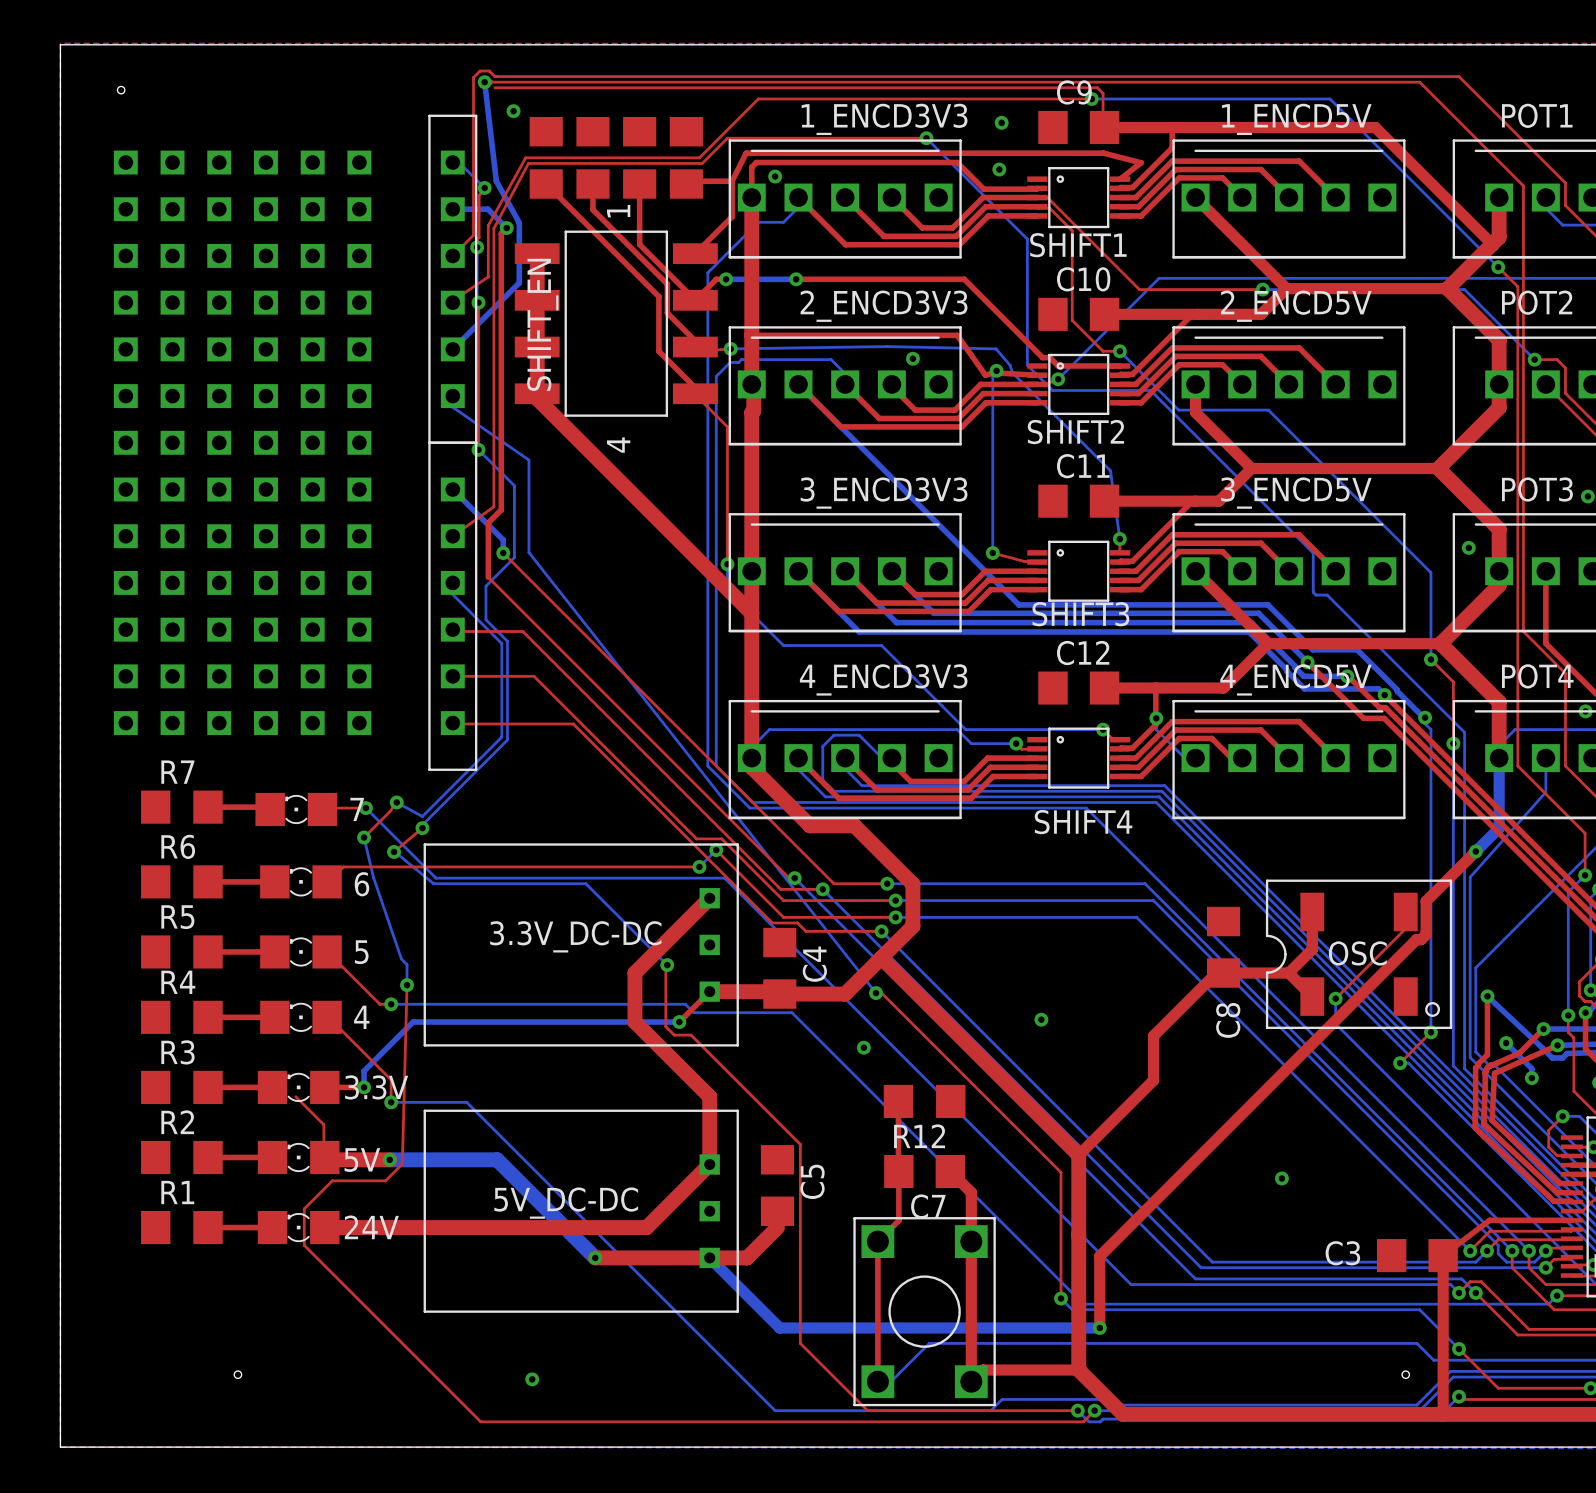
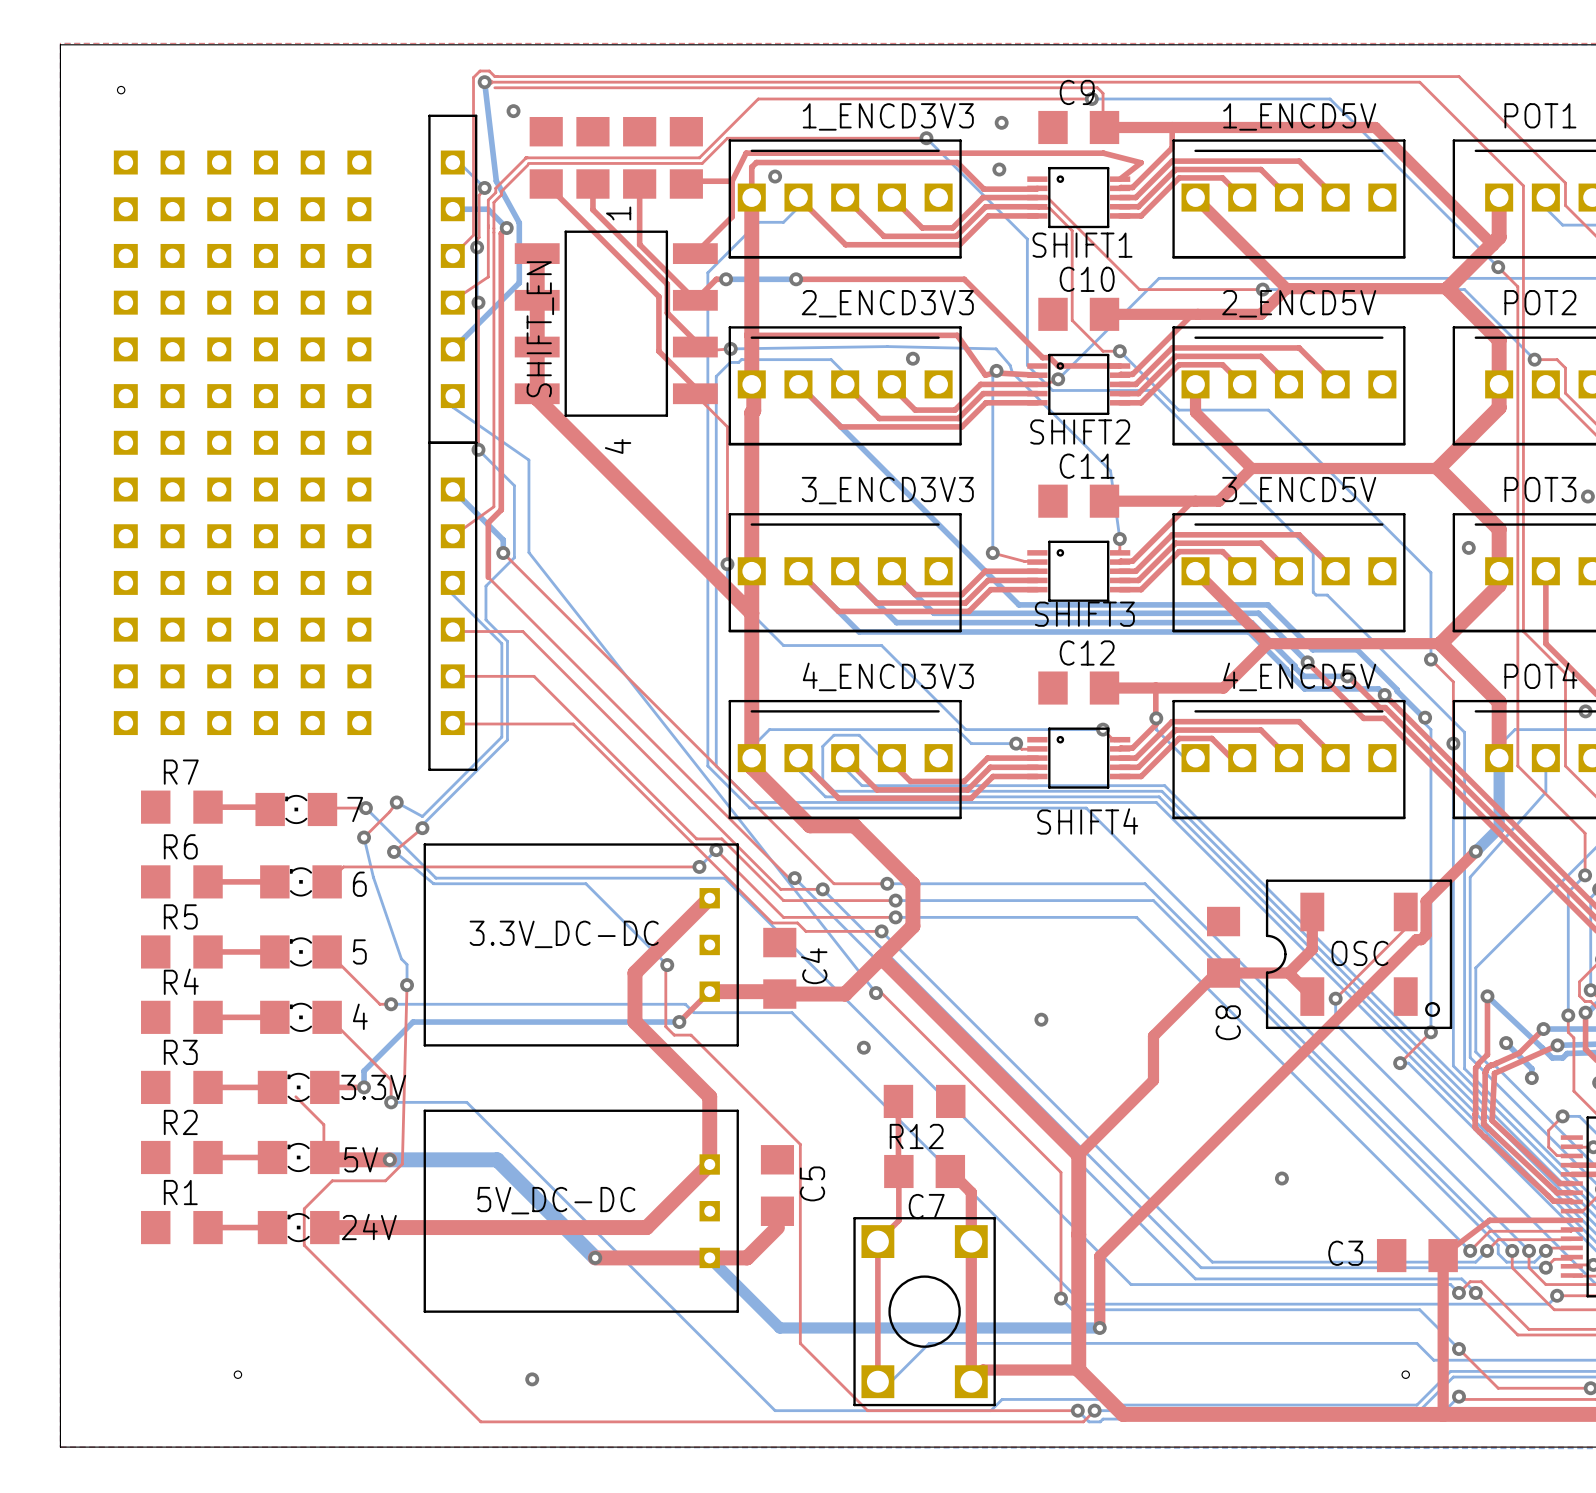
top track: (525, 157) (488, 225) -> (526, 157) (495, 188) (495, 192) (488, 200) (488, 225)
top track: (528, 163) (493, 228) -> (527, 165) (501, 191) (501, 194) (493, 202) (493, 228)

